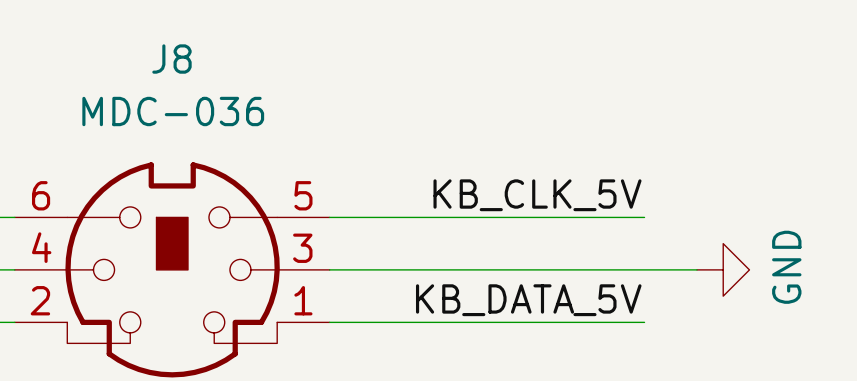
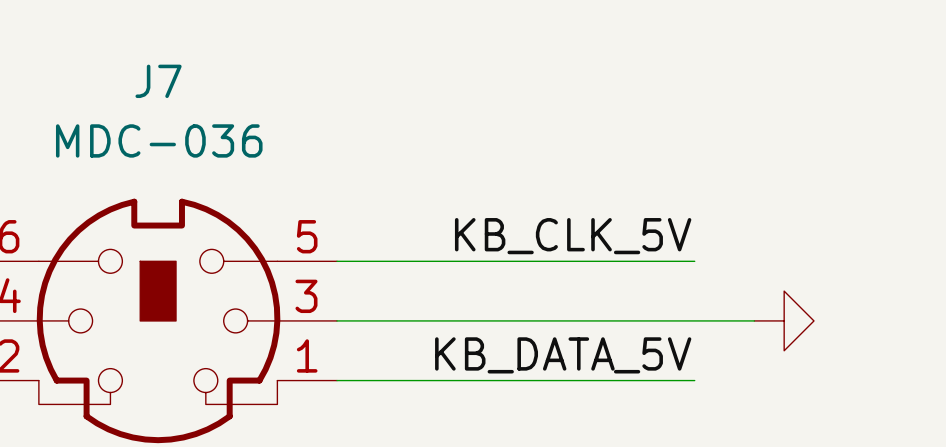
J8 name: J8 (171, 59) -> J7 (158, 81)
power symbol text: GND (786, 267) -> none

